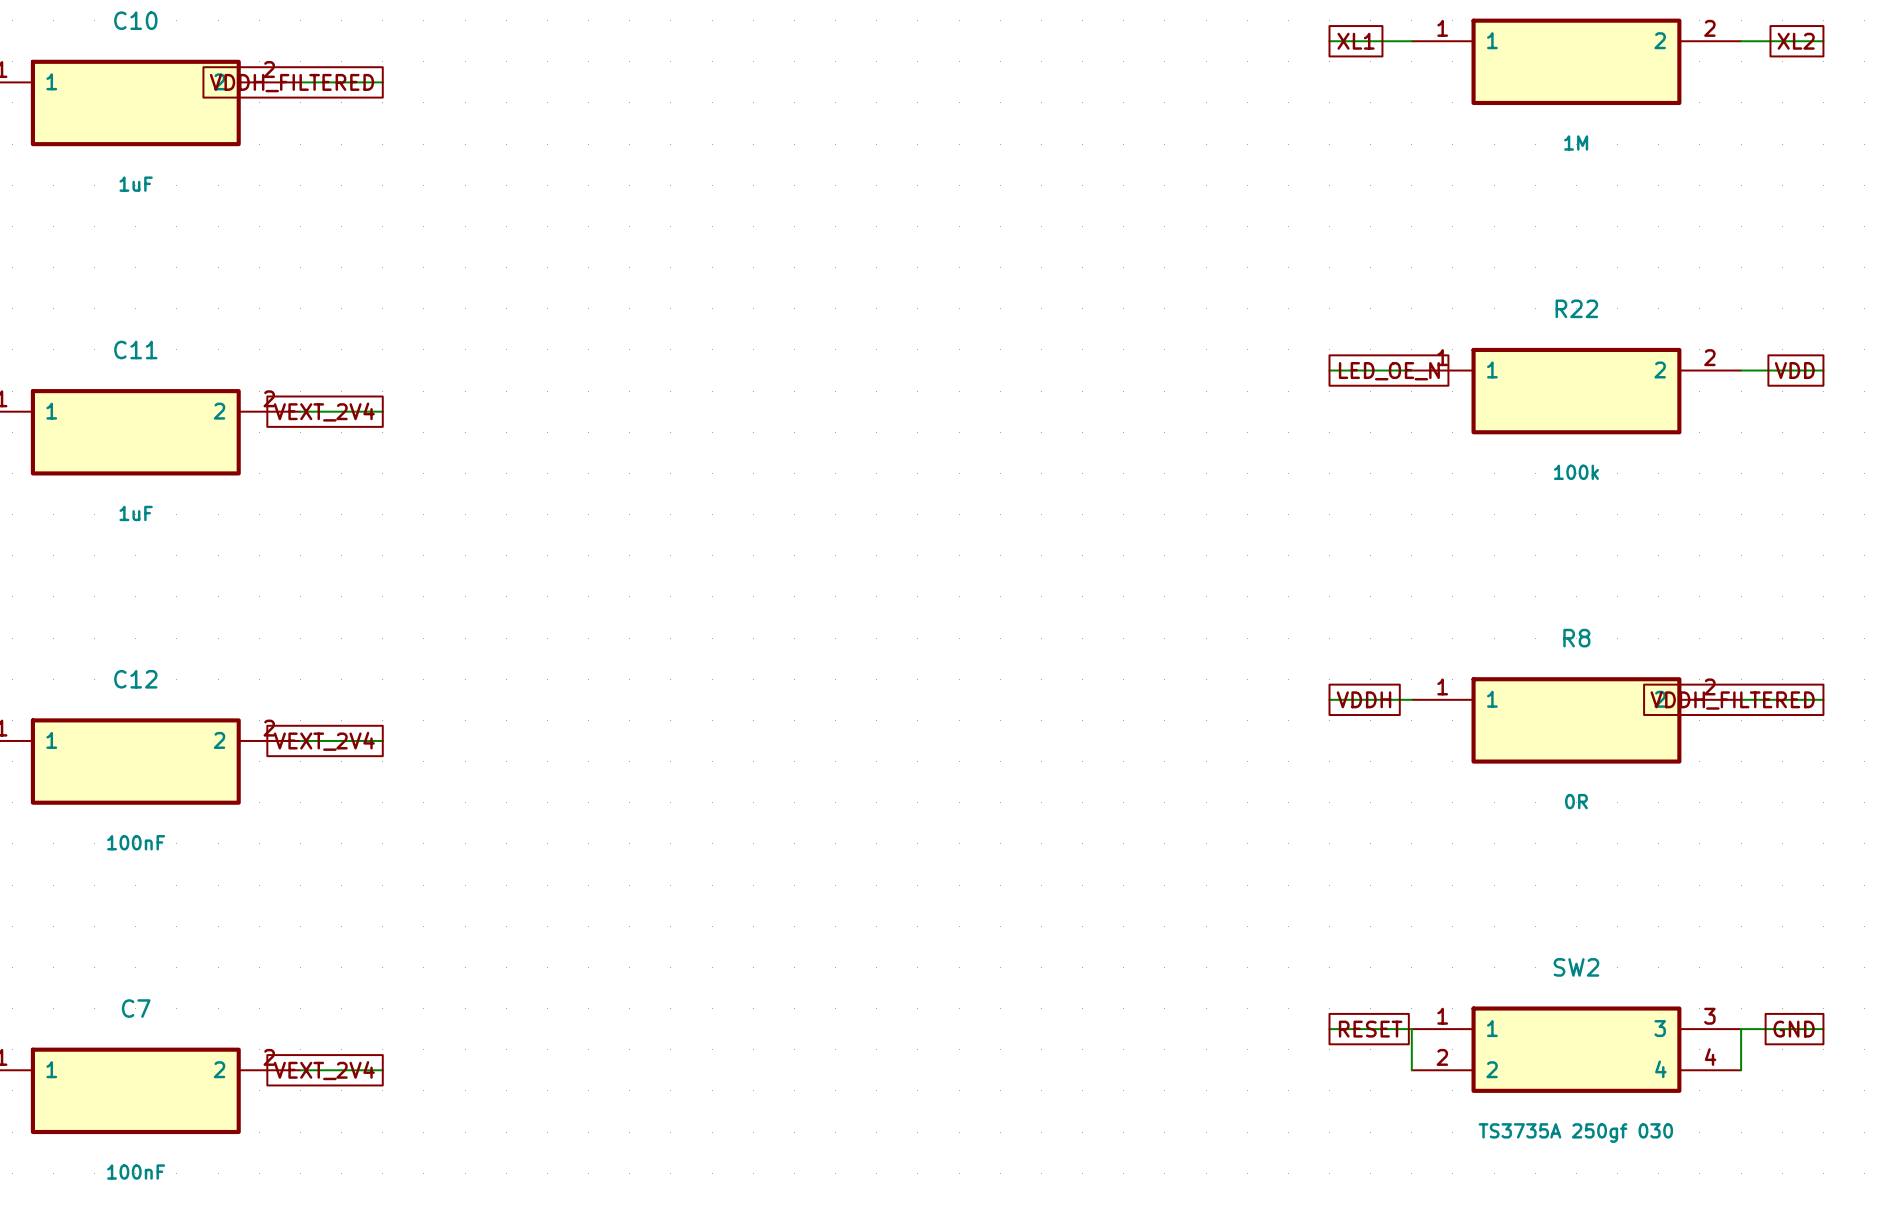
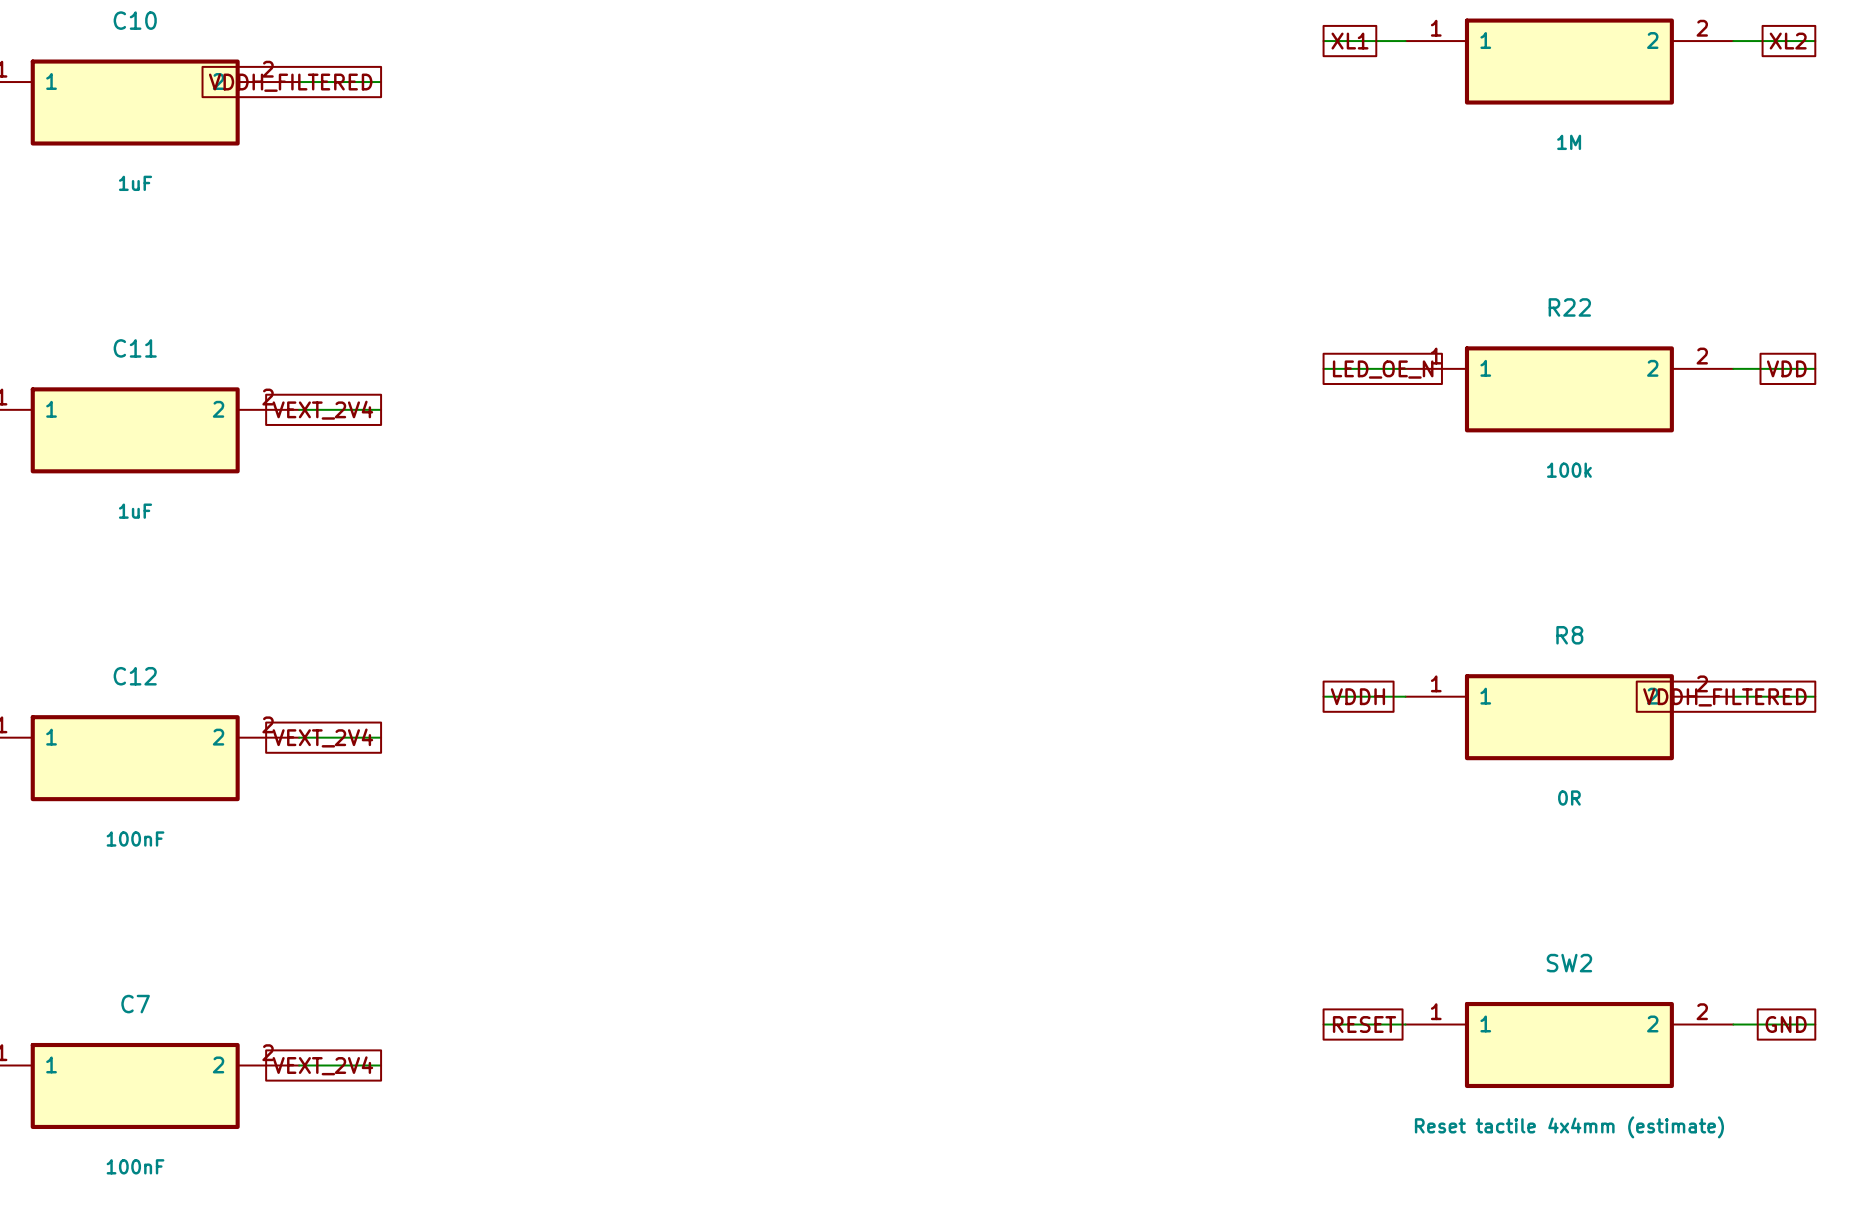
SW2 symbol: [1411, 1006, 1742, 1093] -> [1405, 1001, 1734, 1089]
wire: (1411, 1029) (1411, 1070) -> none
wire: (1741, 1029) (1741, 1070) -> none
SW2 value: TS3735A 250gf 030 (1575, 1133) -> Reset tactile 4x4mm (estimate) (1569, 1127)

